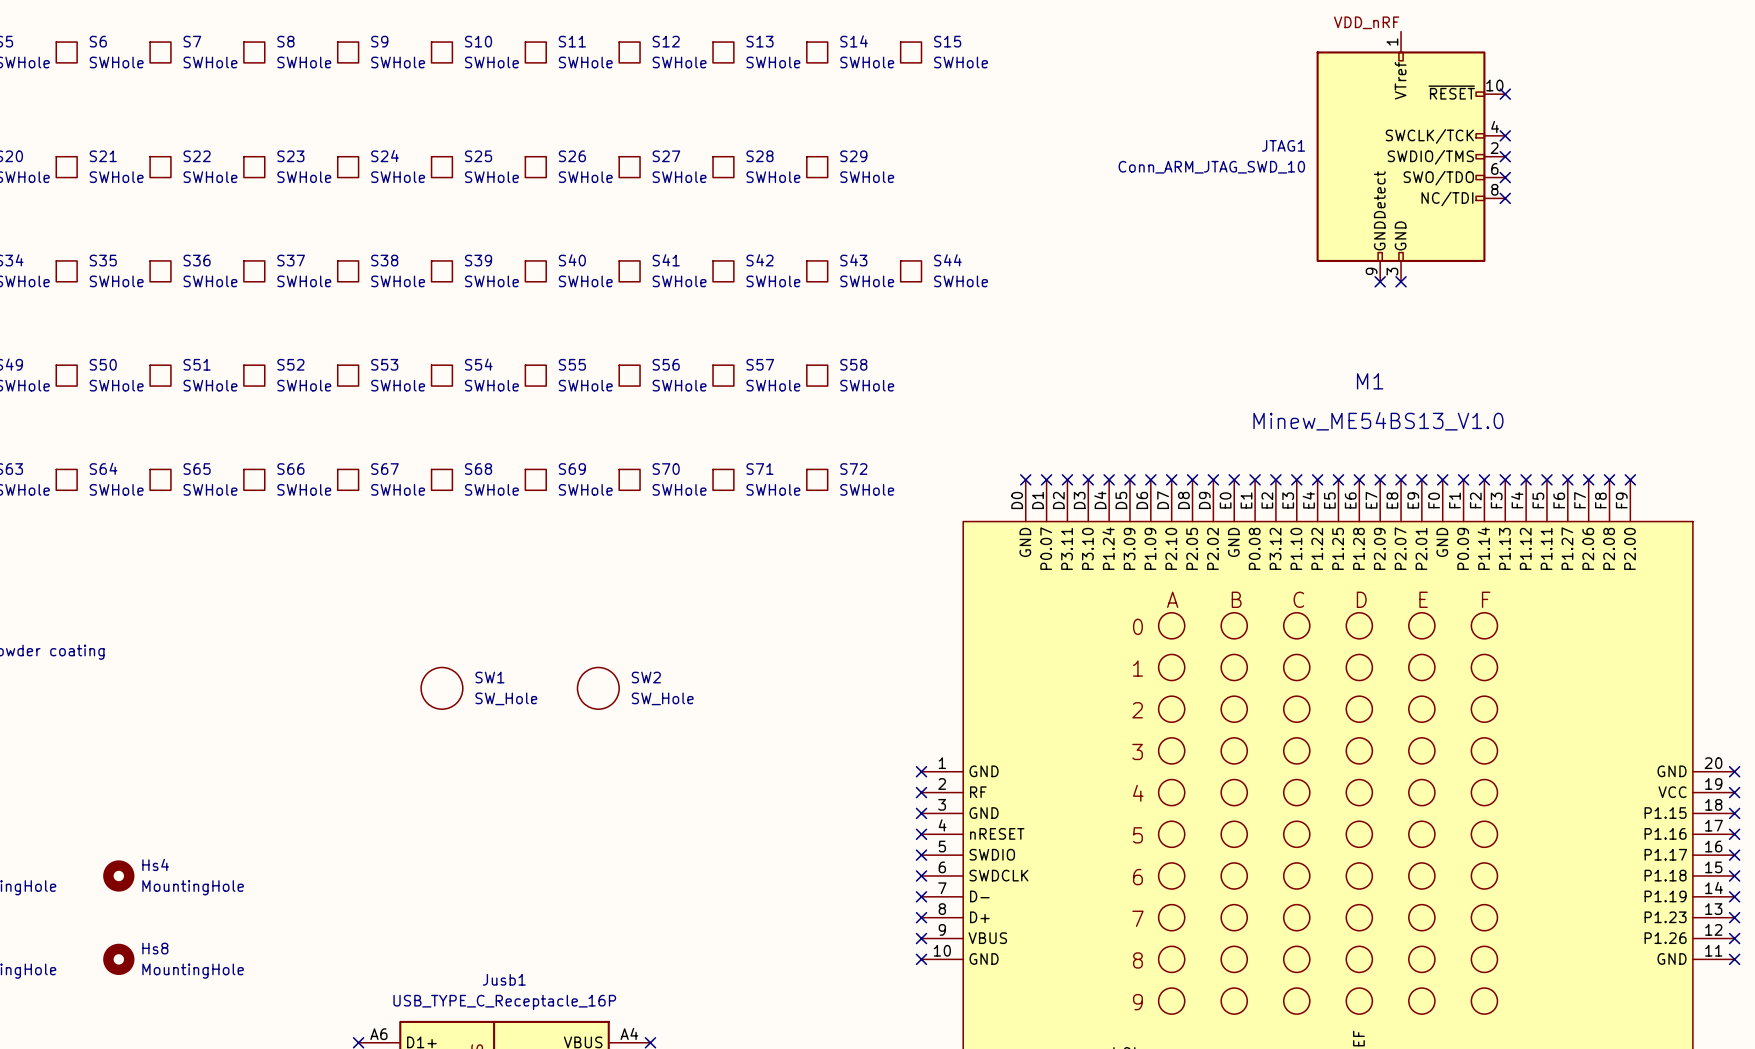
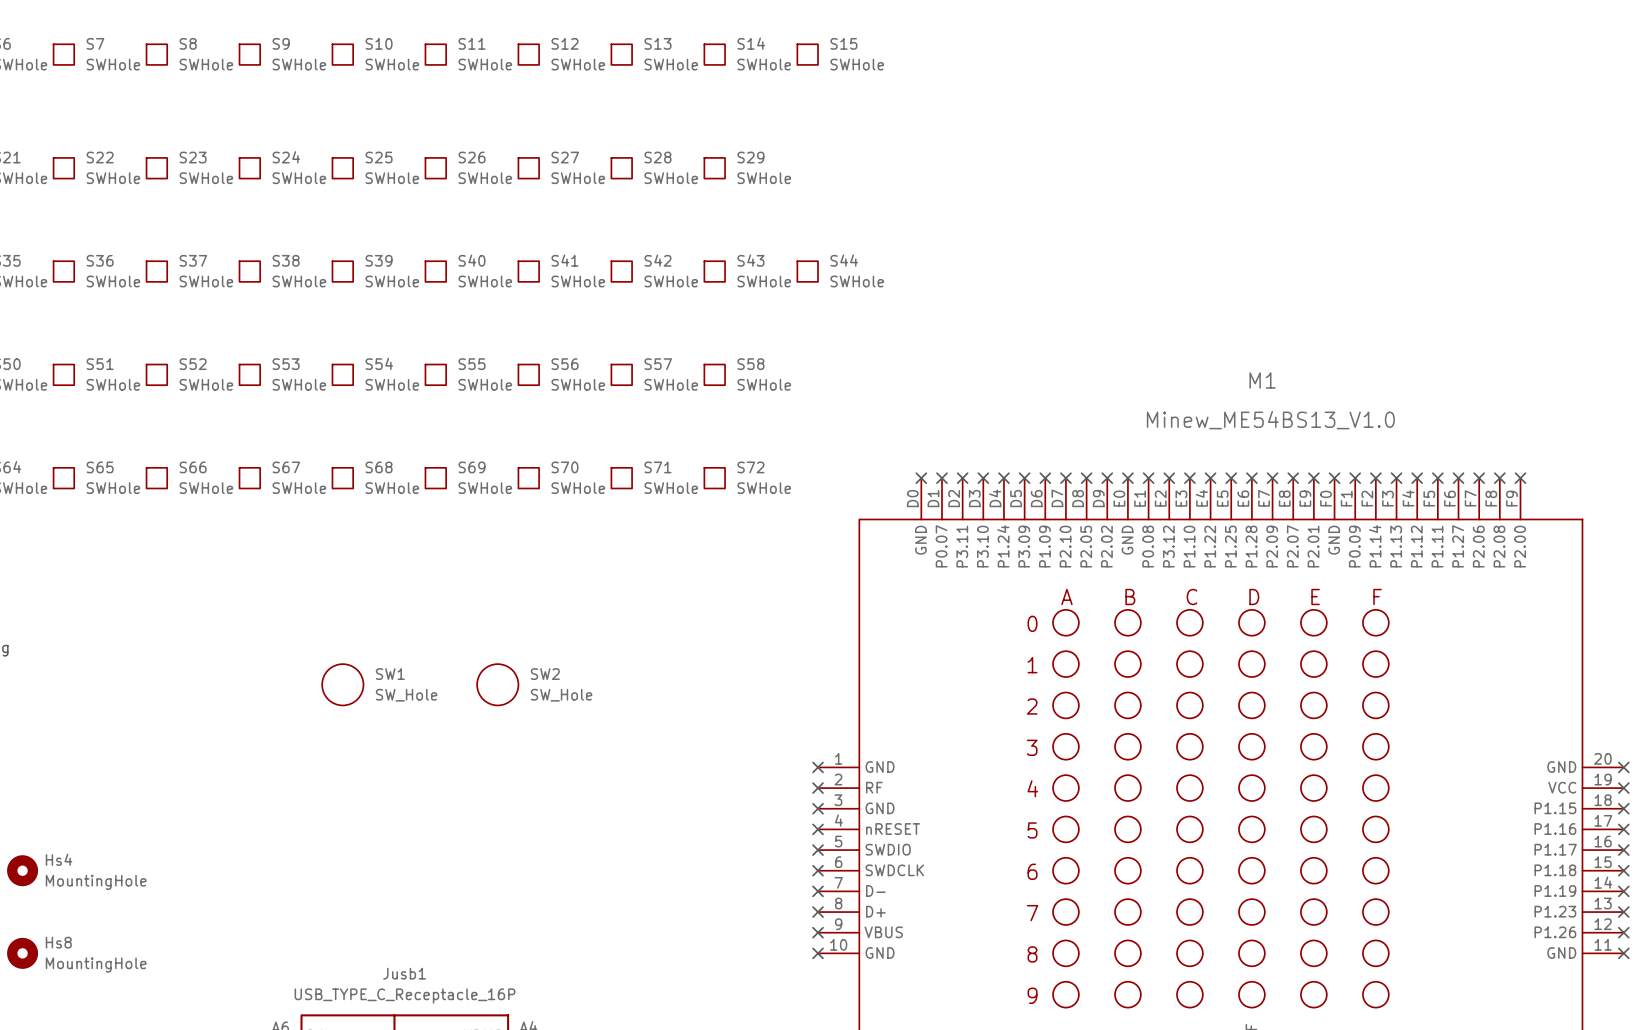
label: VDD_nRF (1366, 22) -> none
no-connect mark: (1505, 94) -> none
no-connect mark: (1505, 135) -> none
JTAG1: Conn_ARM_JTAG_SWD_10 (1410, 156) -> none
no-connect mark: (1505, 156) -> none
no-connect mark: (1505, 177) -> none
no-connect mark: (1505, 198) -> none
no-connect mark: (1380, 281) -> none
no-connect mark: (1401, 281) -> none

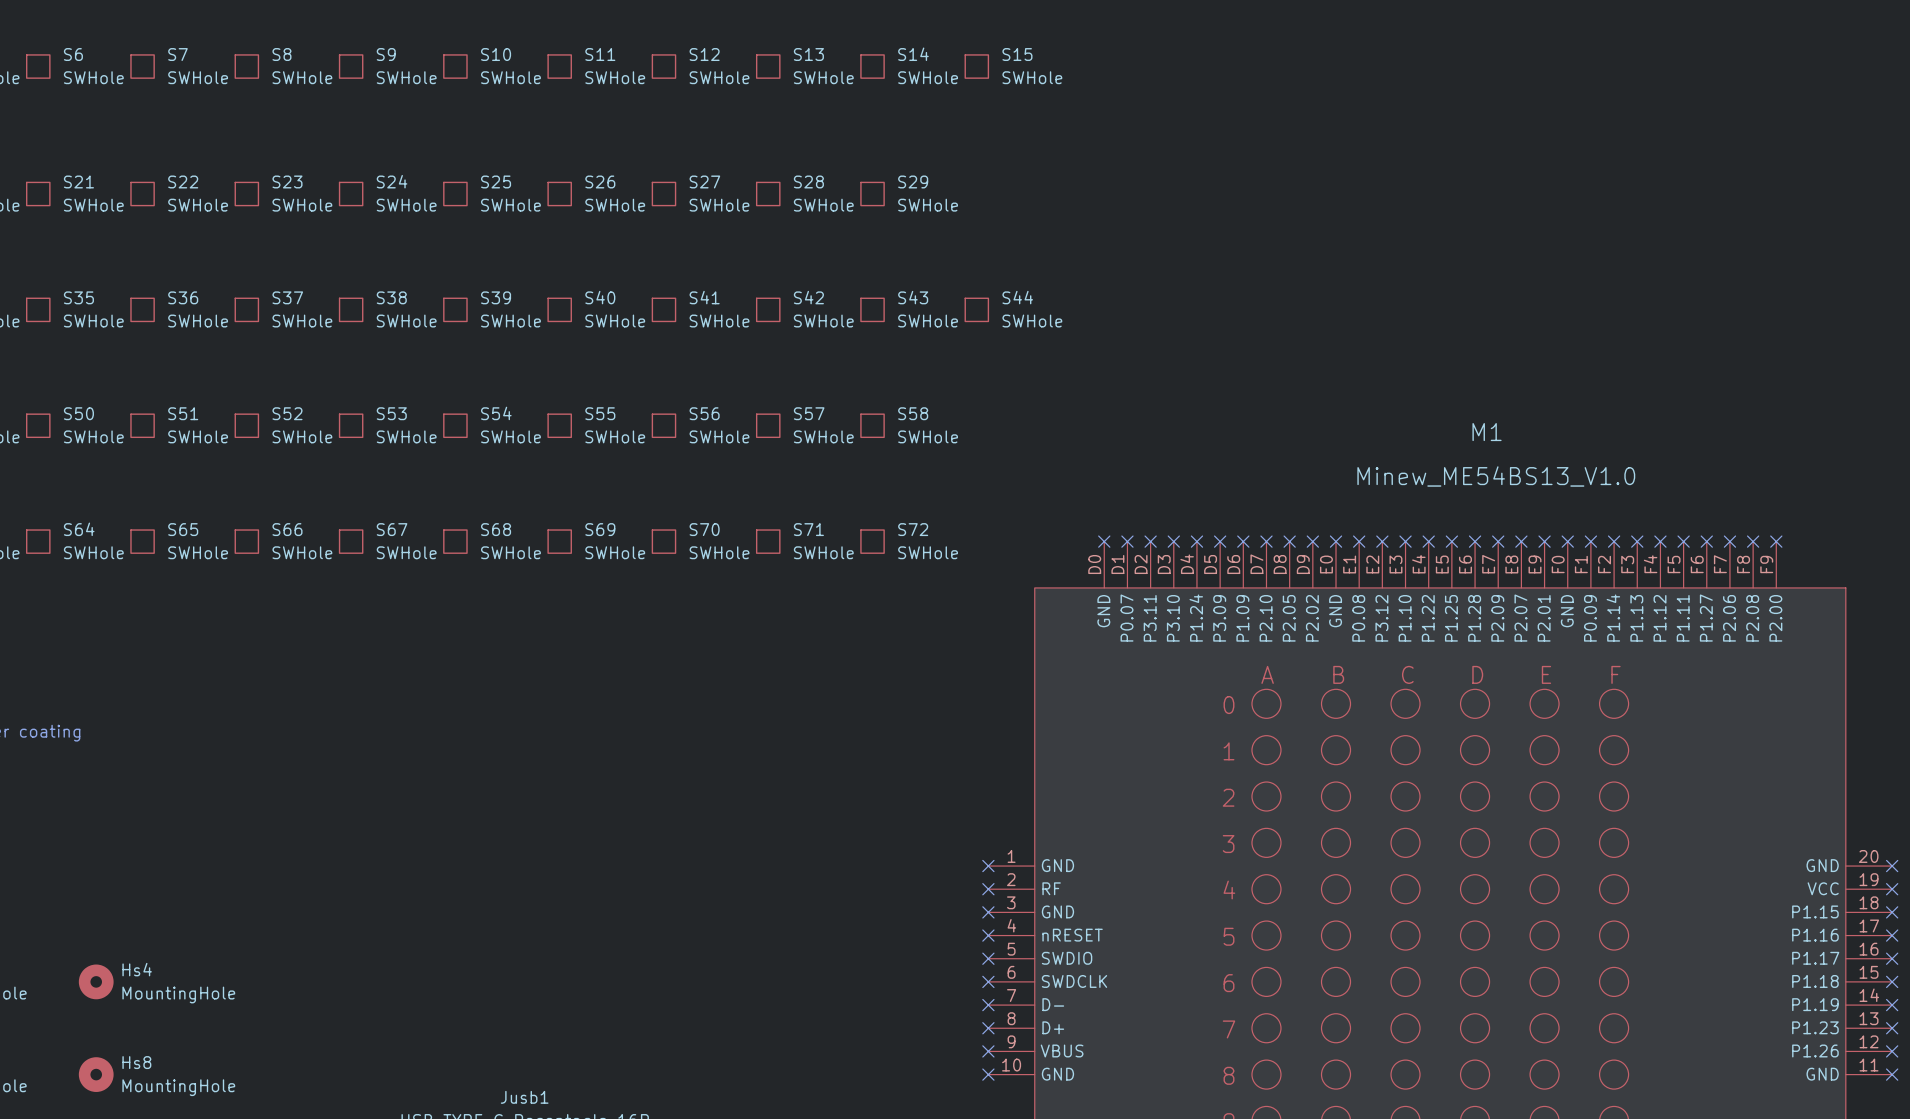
SW1: SW_Hole (342, 684) -> none
SW2: SW_Hole (497, 684) -> none

